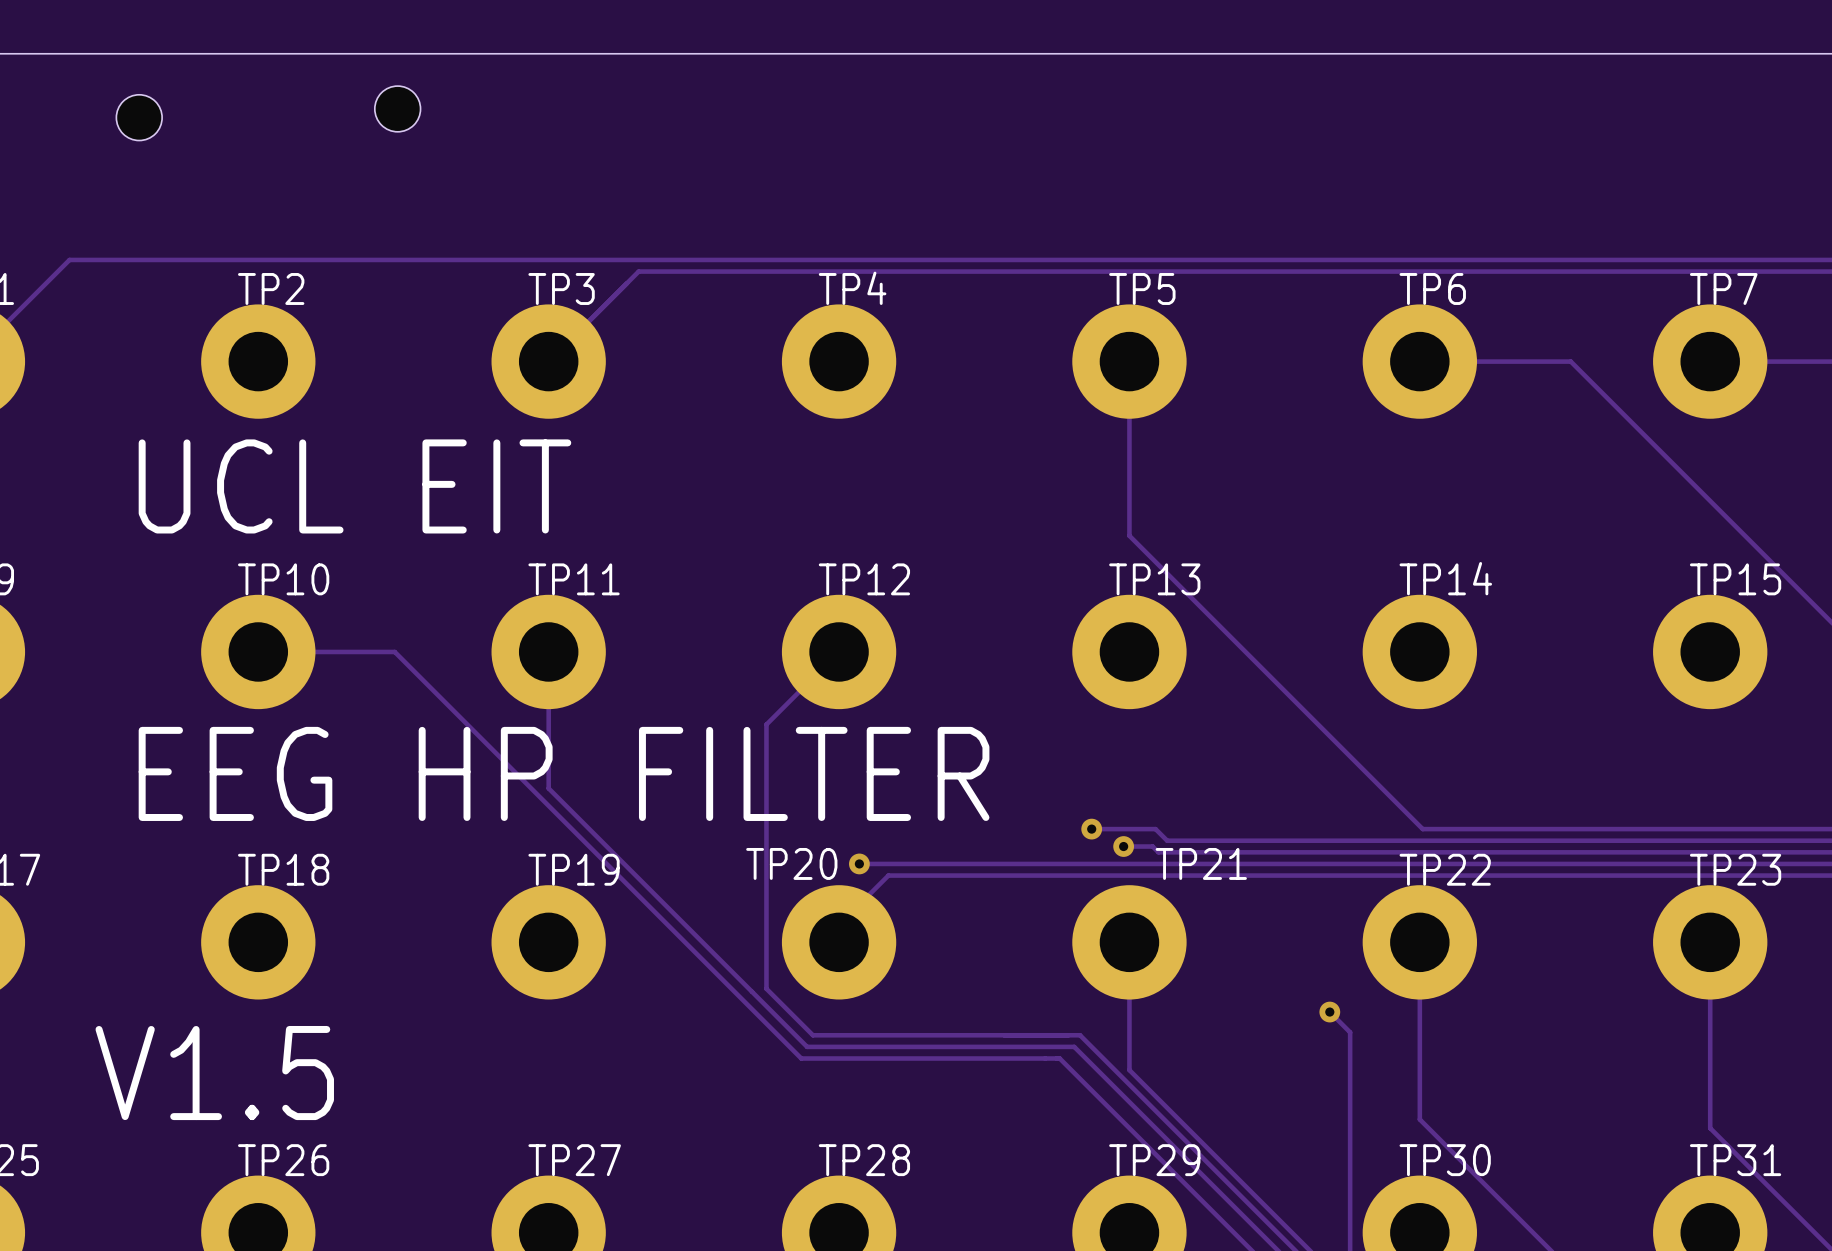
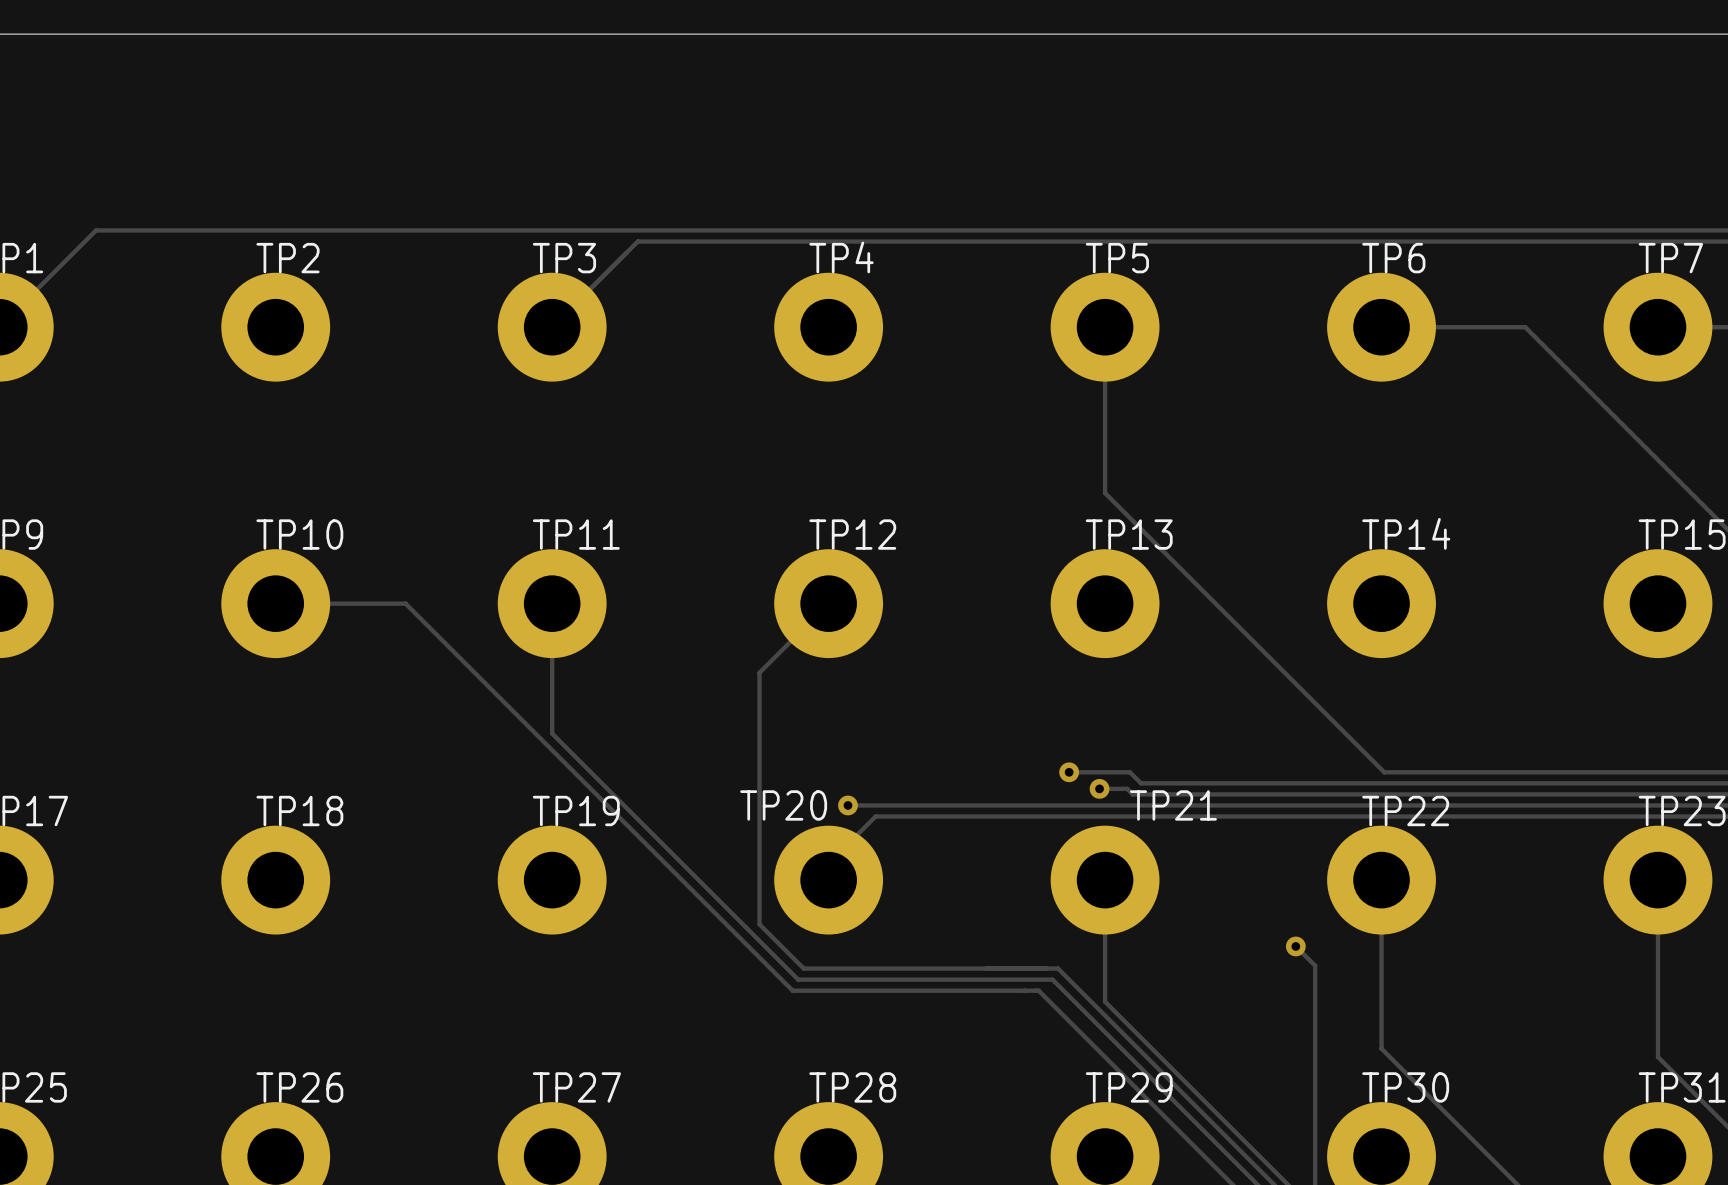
hole: (397, 108) -> none
hole: (139, 117) -> none
text: UCL EIT (354, 486) -> none
text: EEG HP FILTER (564, 773) -> none
text: V1.5 (214, 1073) -> none

